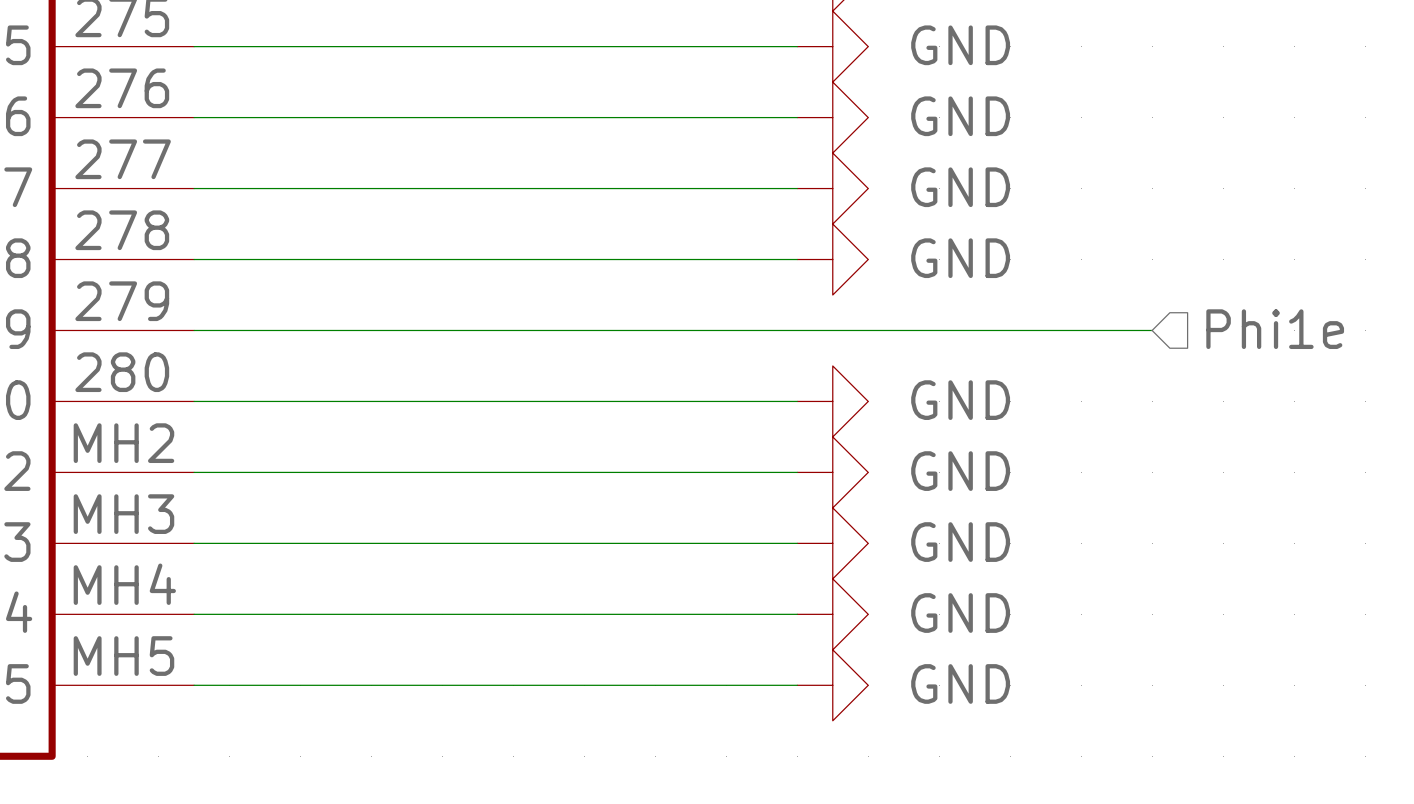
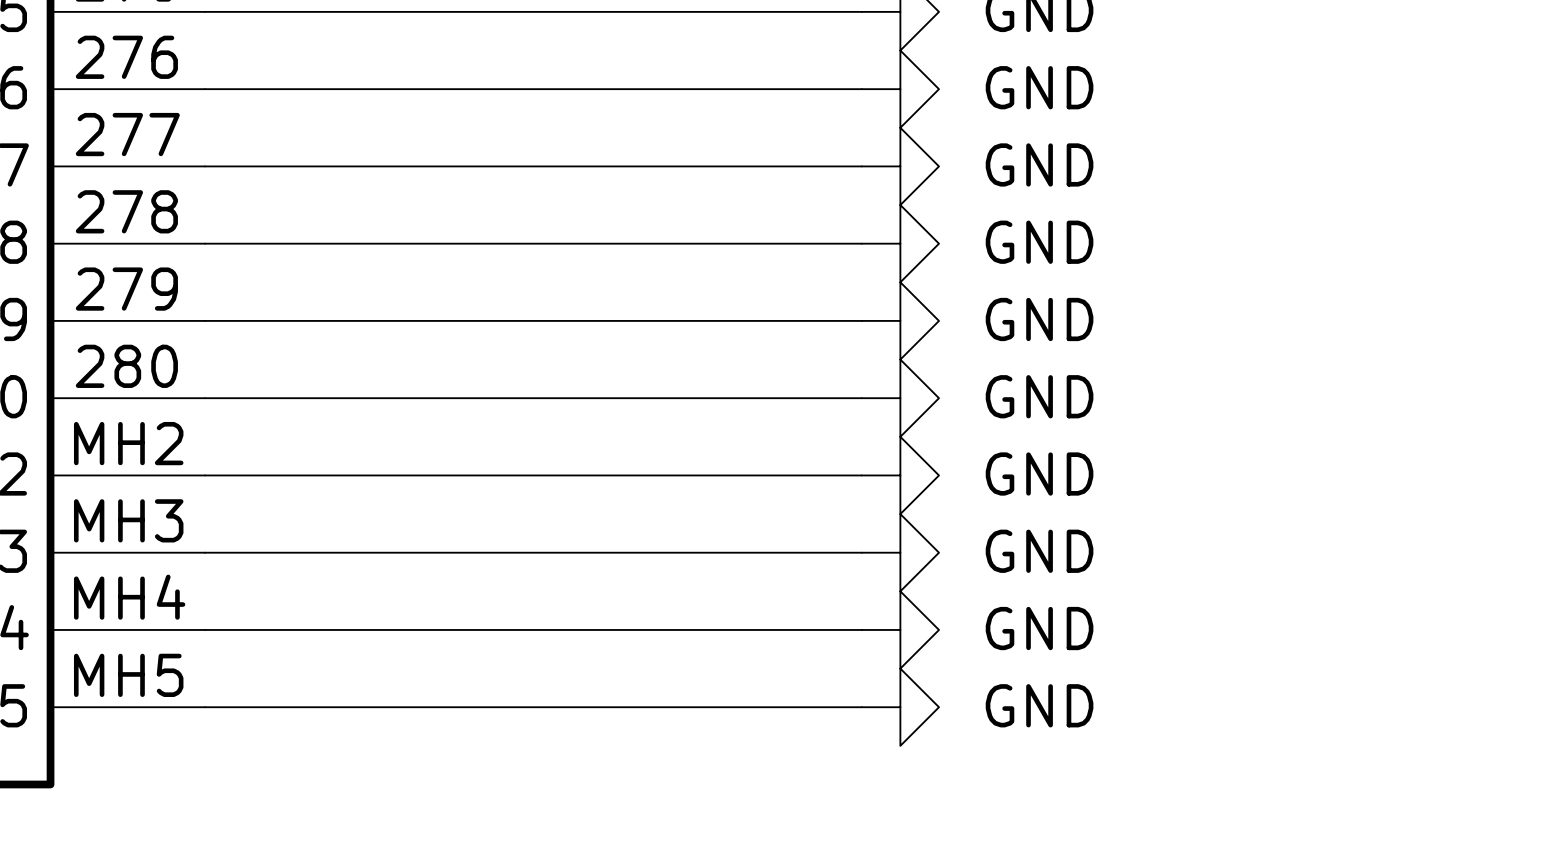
hierarchical label: Phi1e (1275, 329) -> none
wire: (797, 330) (1152, 330) -> none
power symbol: none -> GND (900, 320)

